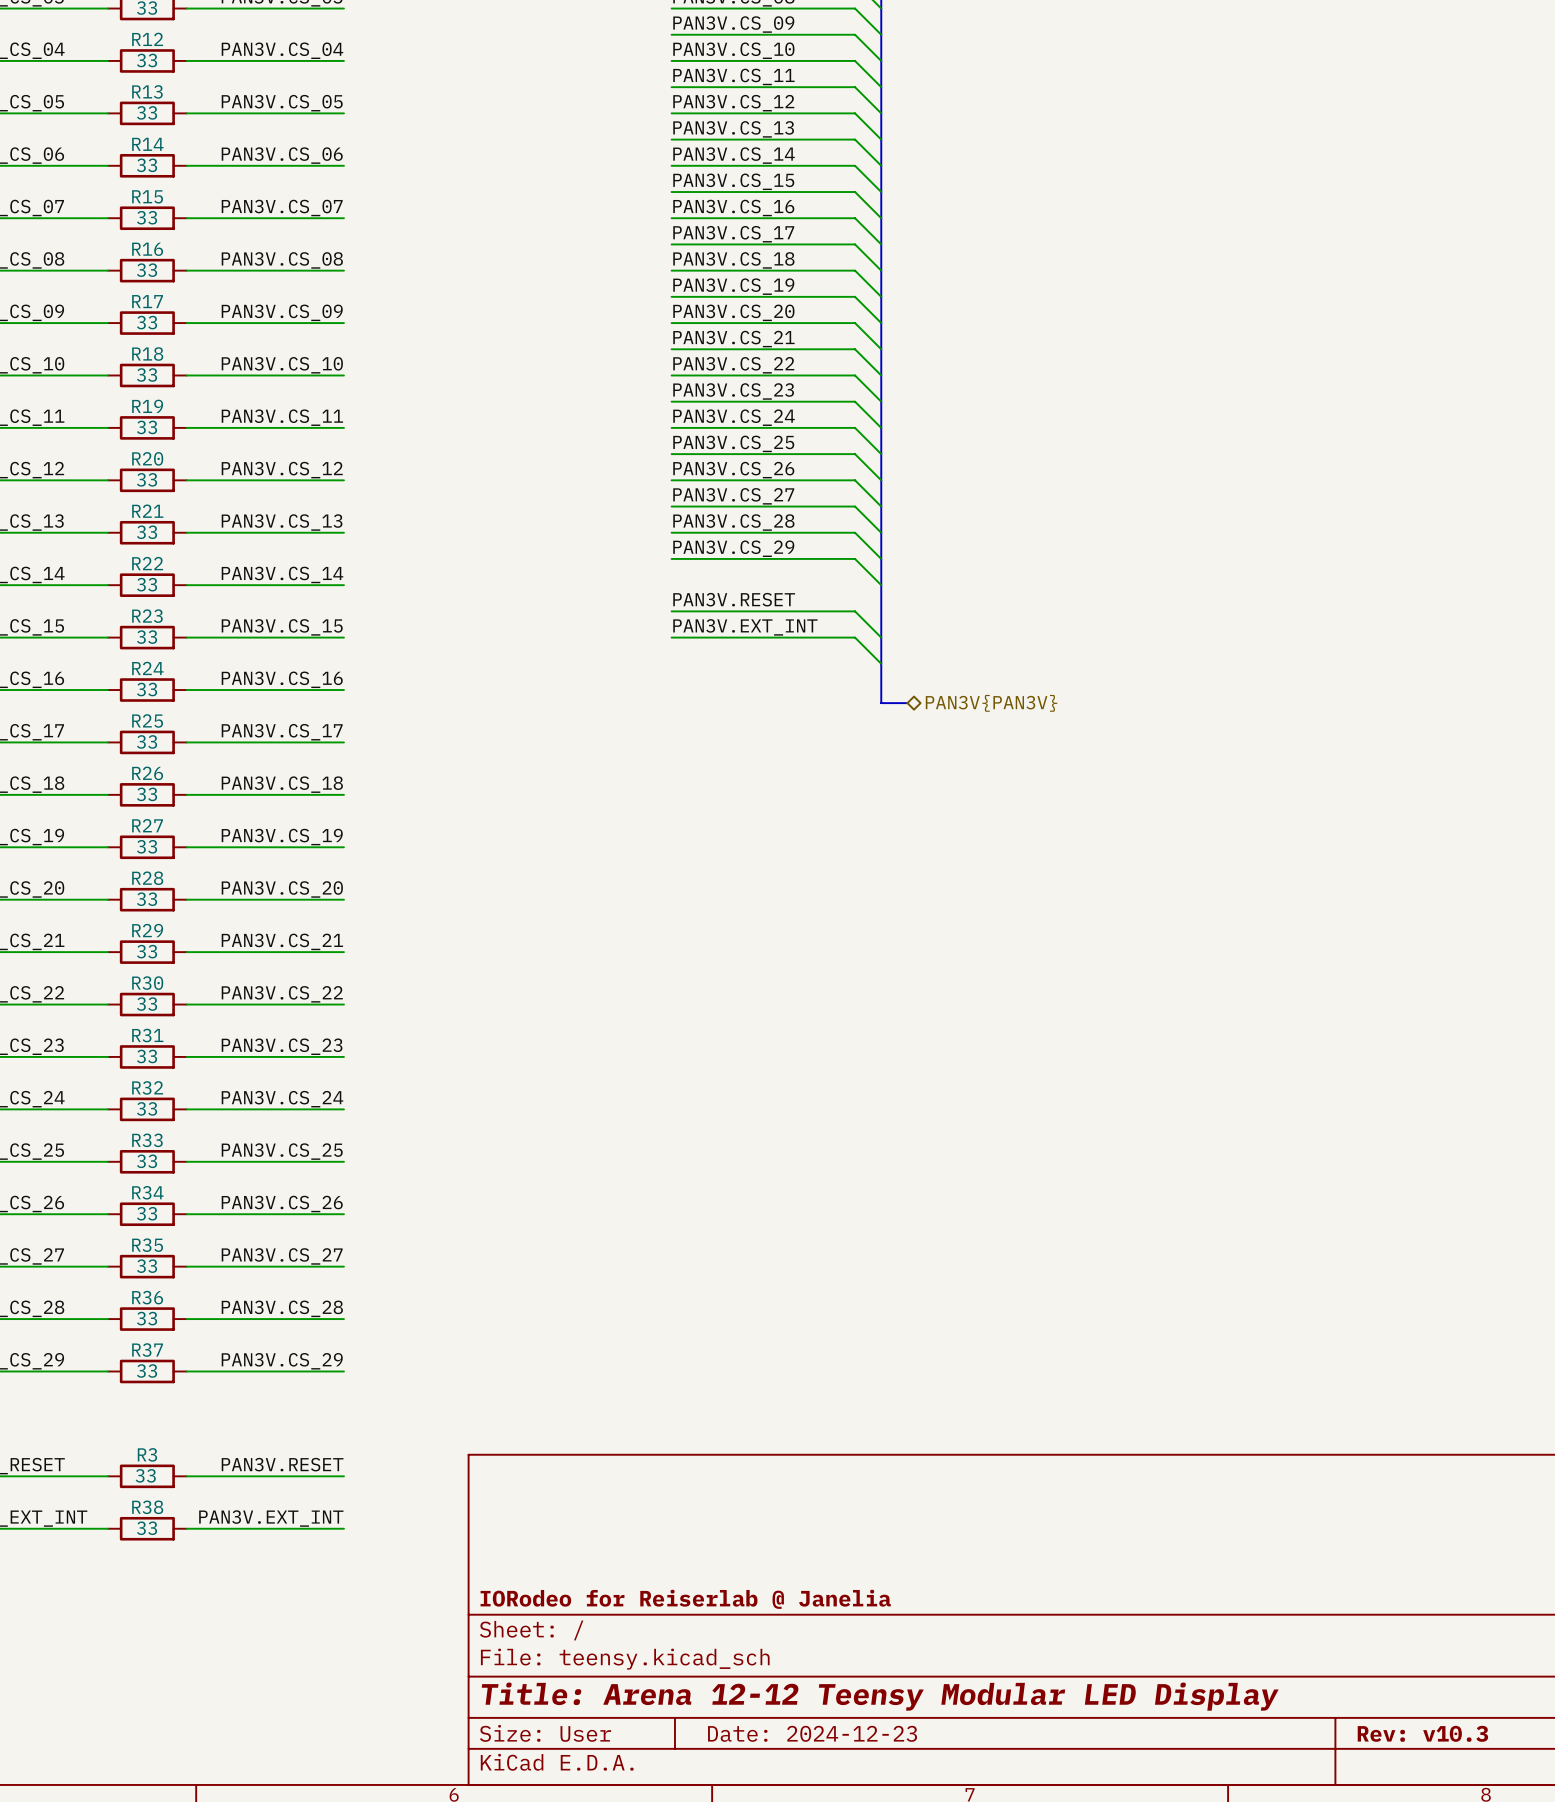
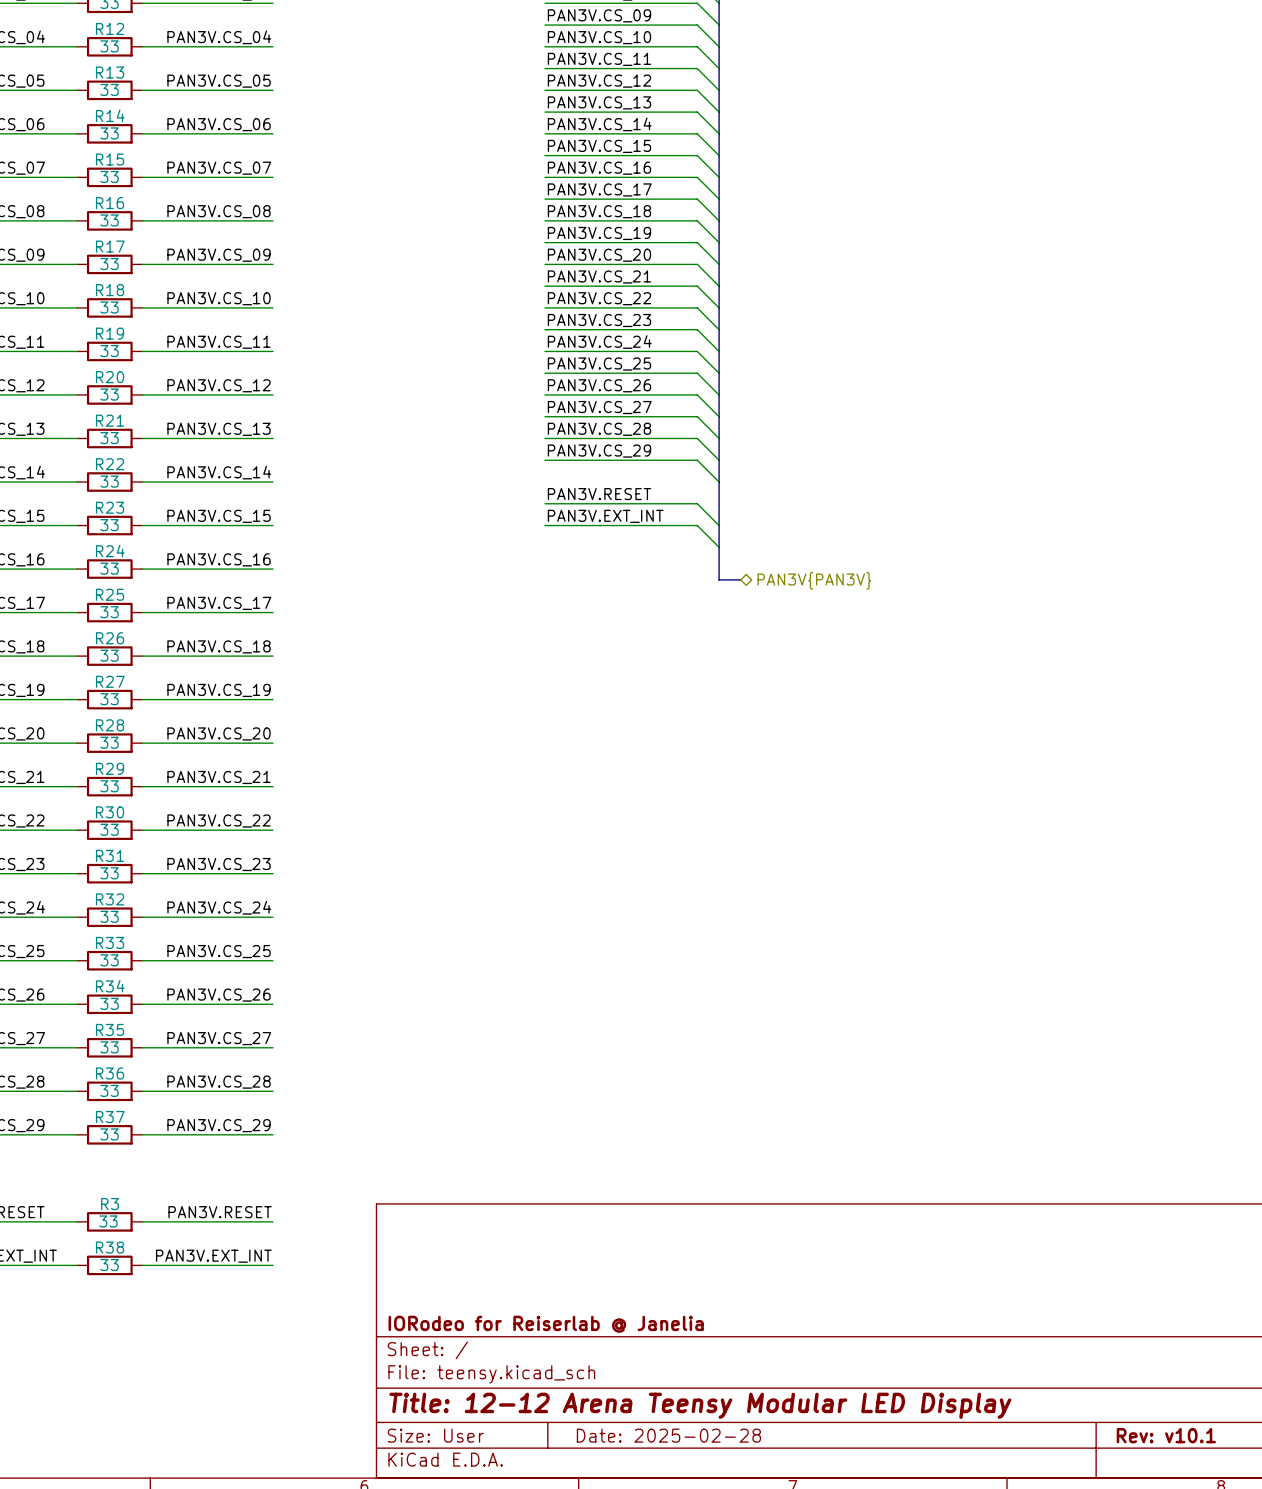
title block: Title: Arena 12-12 Teensy Modular LED Display (880, 1696) -> Title: 12-12 Arena Teensy Modular LED Display (700, 1405)
title block: Date: 2024-12-23 (812, 1733) -> Date: 2025-02-28 (668, 1435)
title block: Rev: v10.3 (1422, 1733) -> Rev: v10.1 (1166, 1435)

